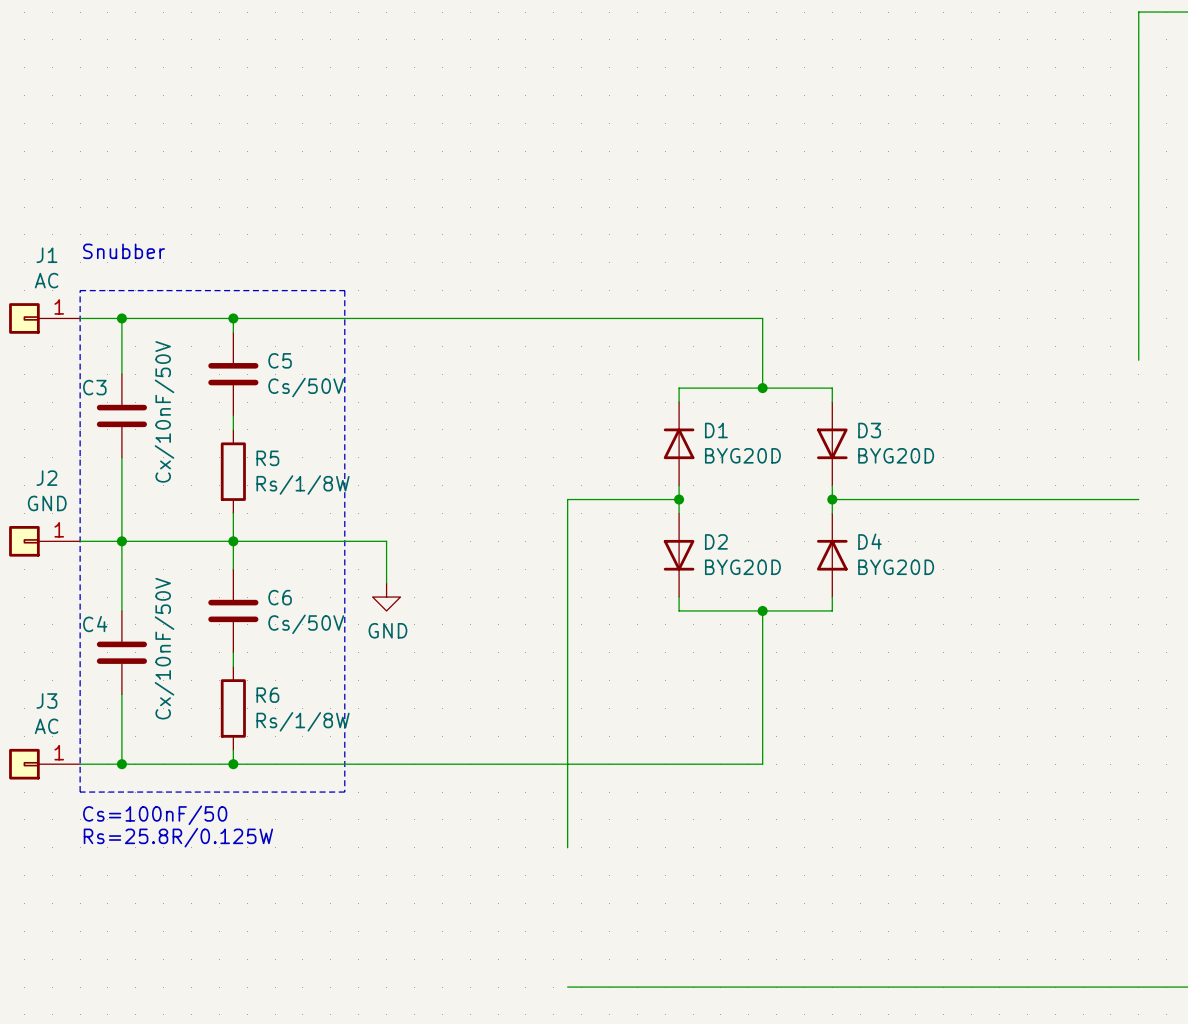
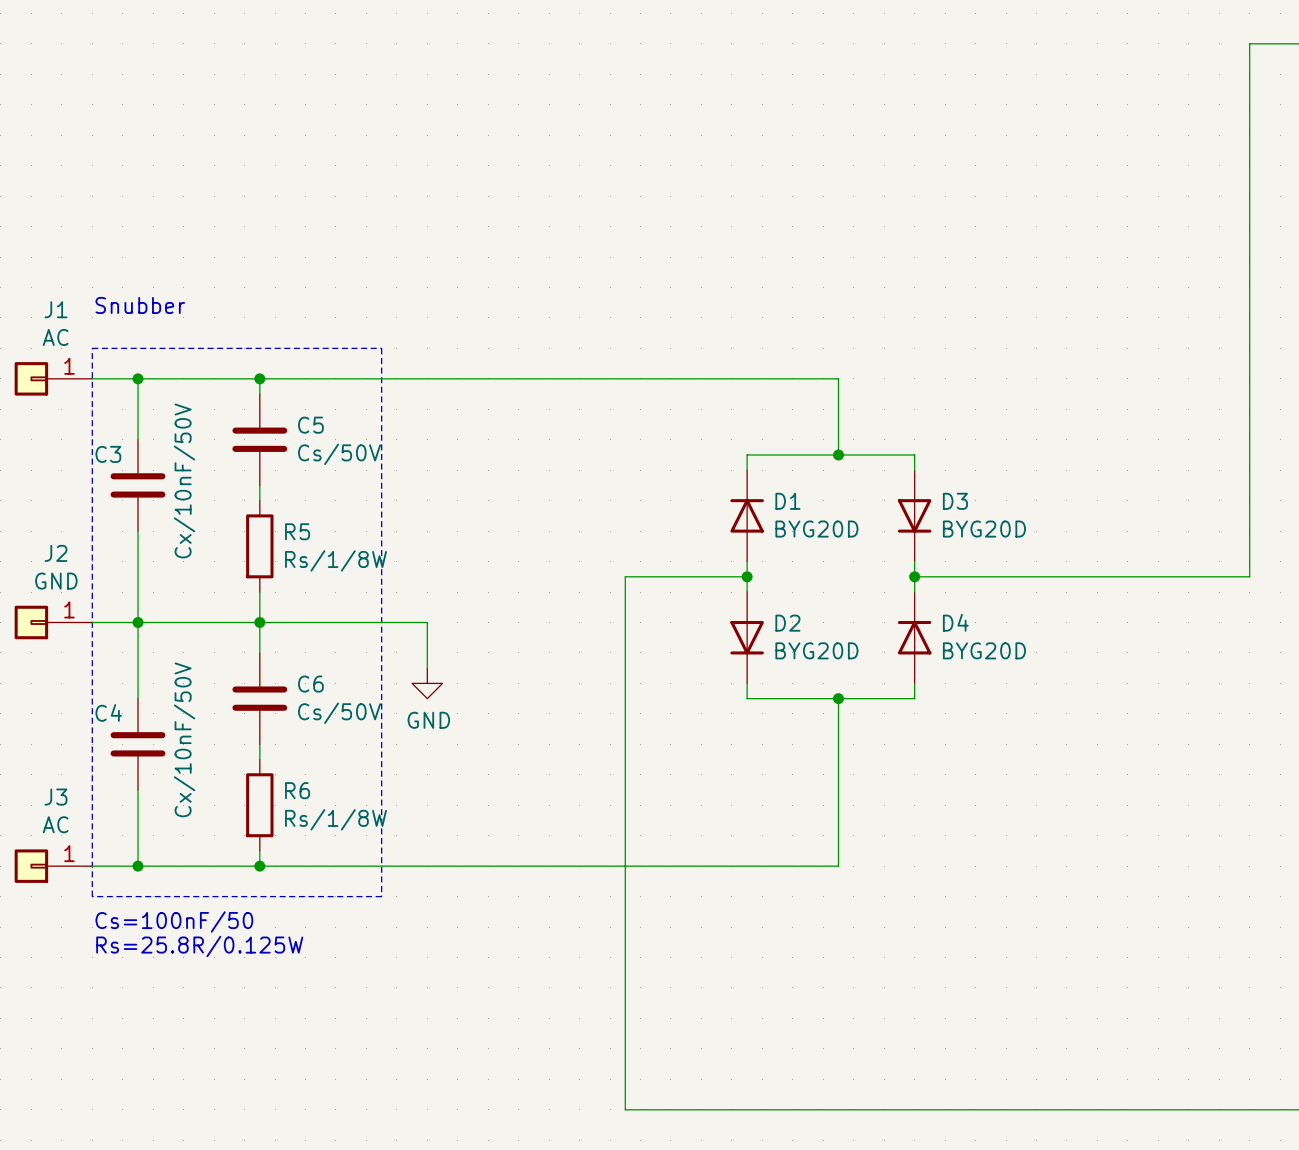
wire: none -> (1249, 424) (1249, 576)
wire: none -> (625, 957) (625, 1109)

